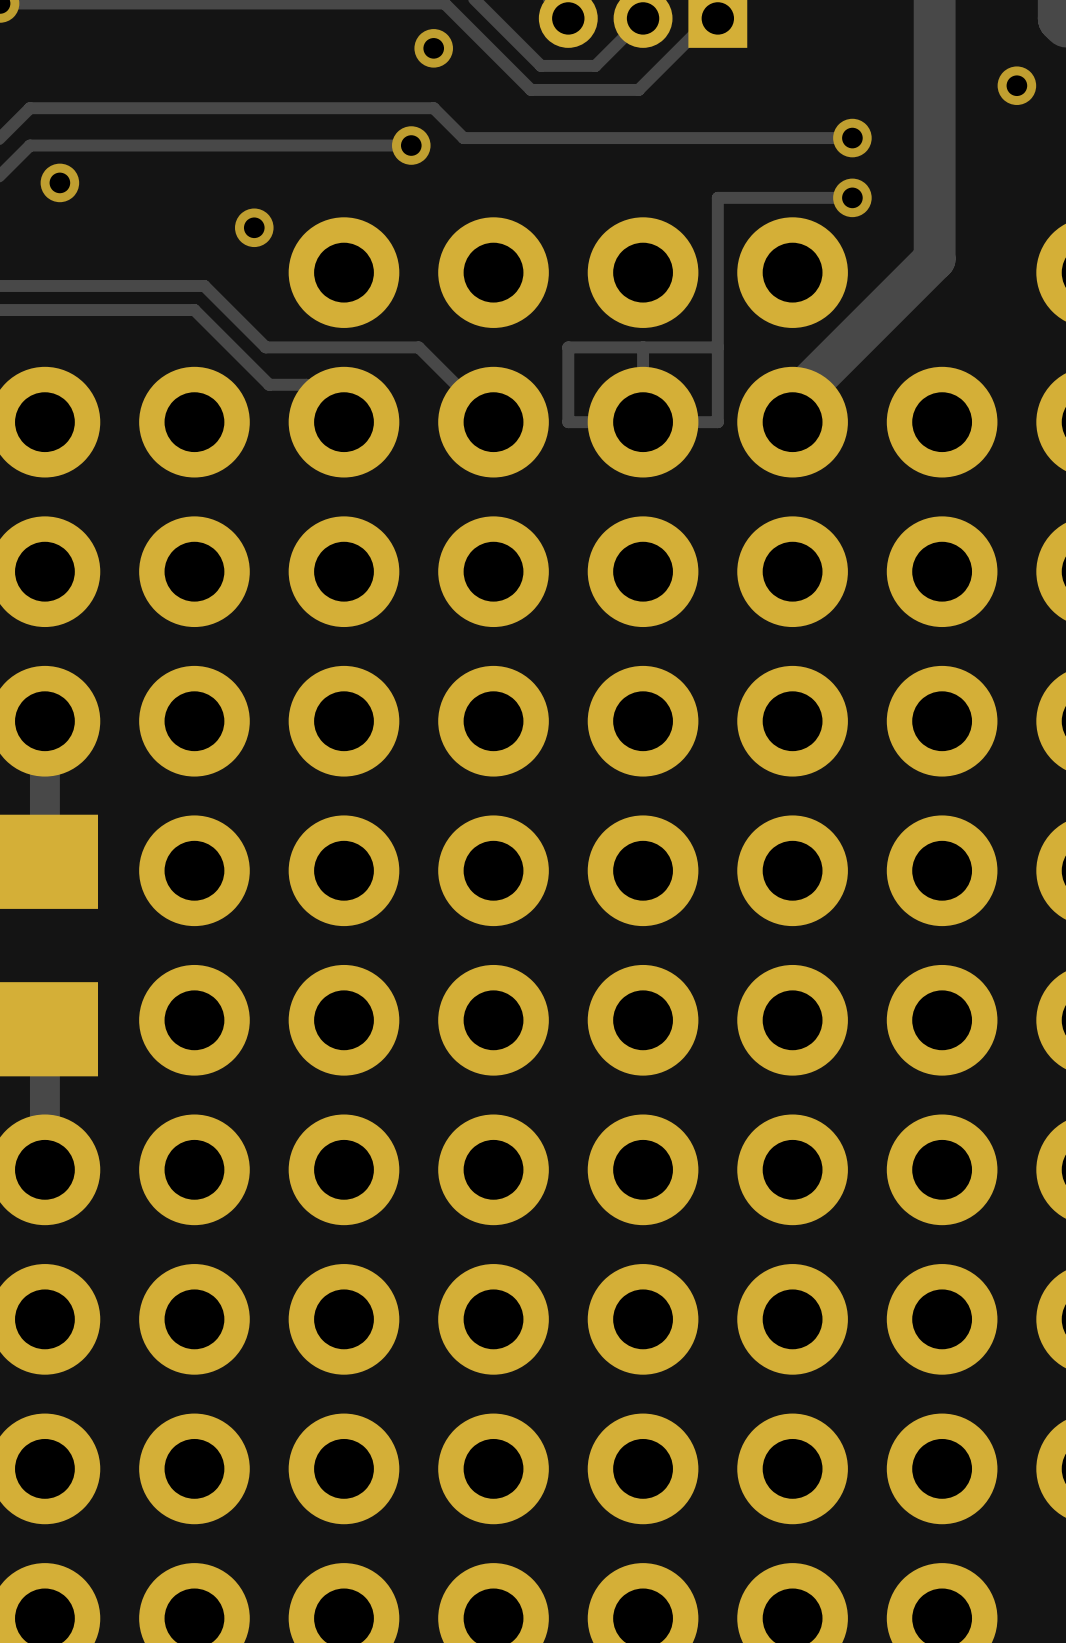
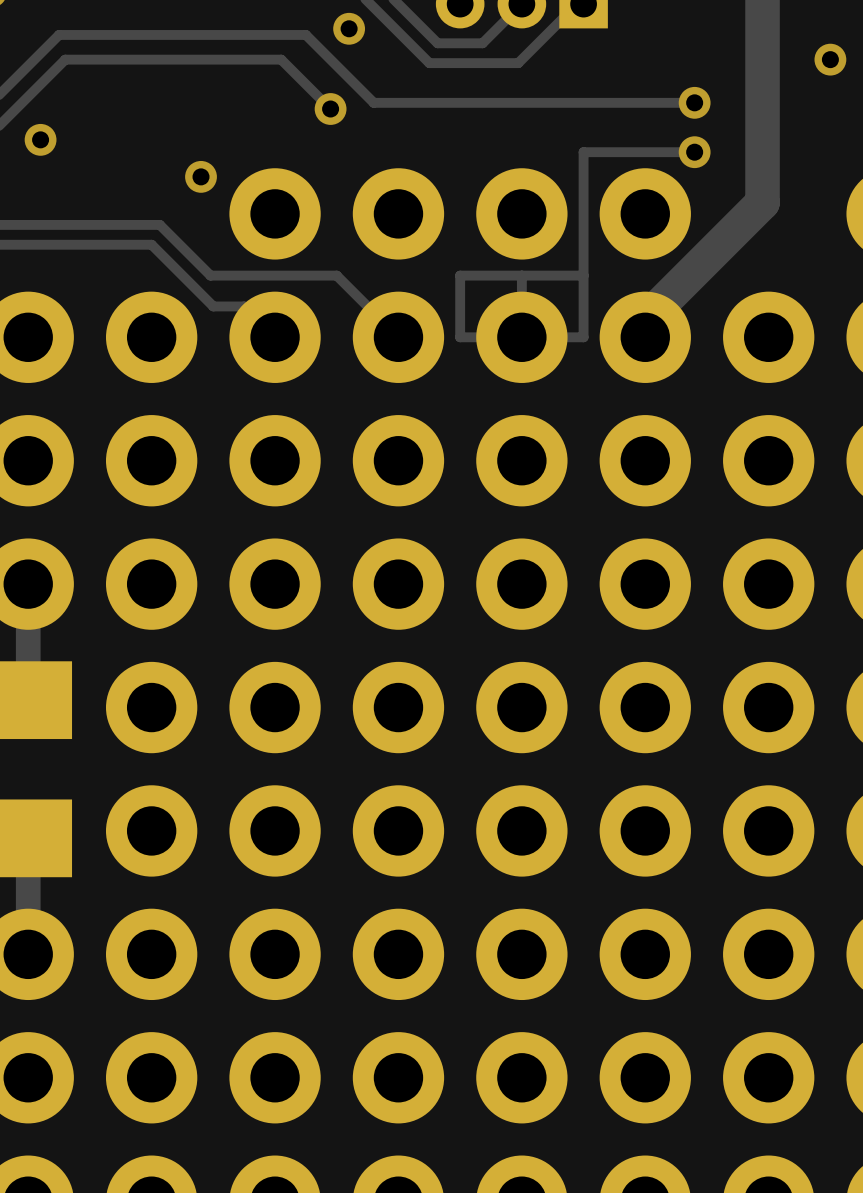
track: (433, 108) (29, 108) -> (349, 78) (305, 34) (59, 34) (15, 78)
track: (411, 145) (29, 145) -> (330, 109) (281, 59) (65, 59) (15, 109)

